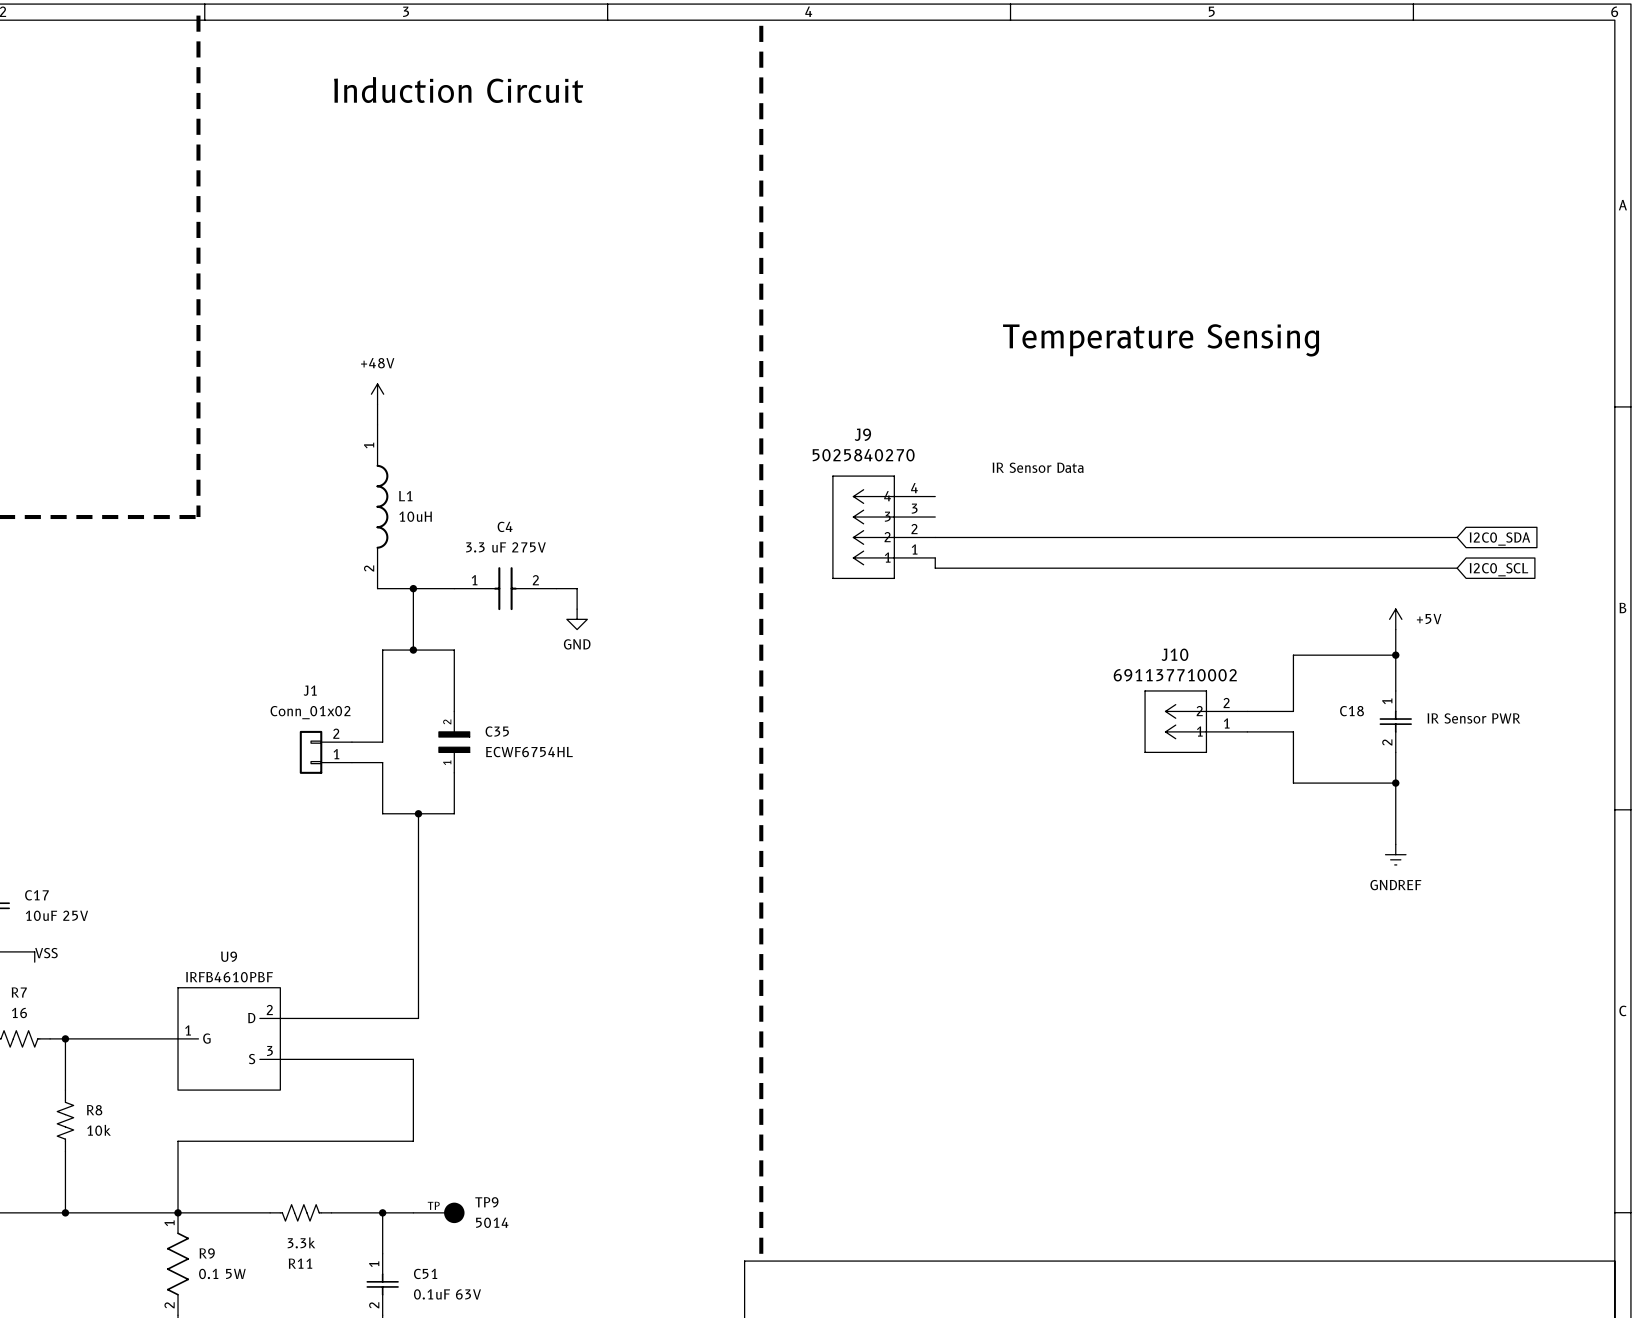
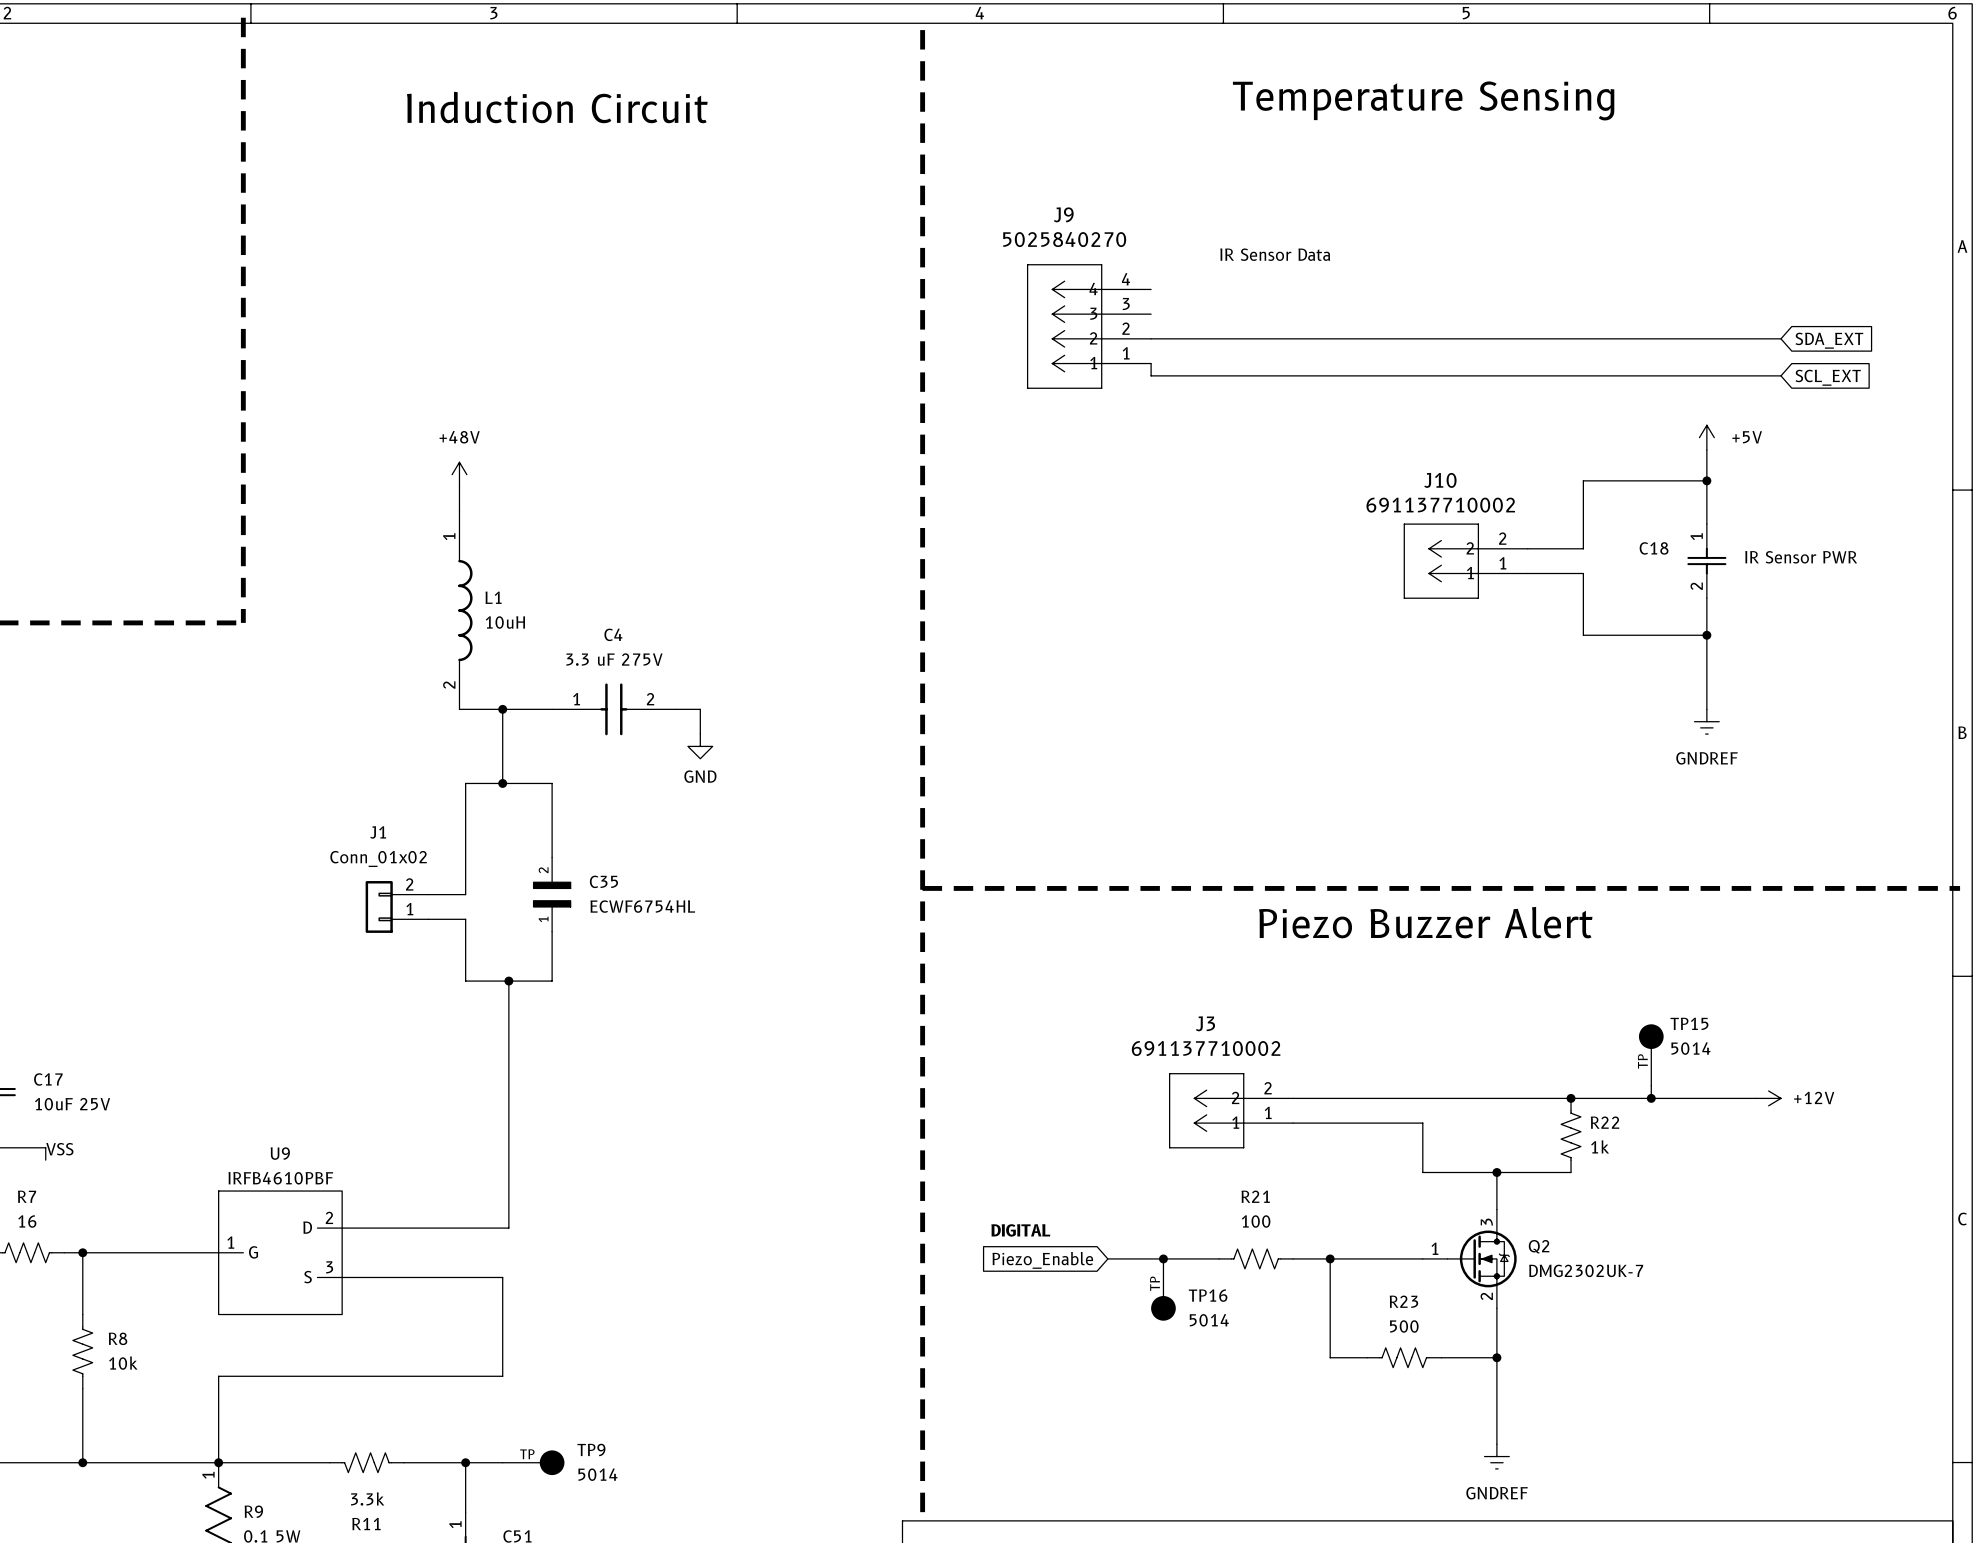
text: none -> Temperature Sensing (1423, 100)
text: none -> IR Sensor Data (1275, 254)
wire: none -> (1151, 338) (1780, 338)
global label: none -> SDA_EXT (1829, 340)
wire: none -> (1151, 363) (1151, 375) (1780, 375)
global label: none -> SCL_EXT (1828, 377)
text: Temperature Sensing (1161, 340) -> none
power symbol: none -> +5V (1706, 437)
wire: none -> (1706, 449) (1706, 524)
wire: none -> (1706, 480) (1583, 480) (1583, 548) (1527, 548)
junction: none -> (1706, 480)
text: none -> IR Sensor PWR (1801, 557)
text: IR Sensor Data (1038, 467) -> none
wire: none -> (1527, 573) (1583, 573) (1583, 635) (1706, 635)
wire: none -> (1706, 598) (1706, 709)
J9 position: (883, 527) -> (1089, 326)
junction: none -> (1706, 635)
wire: (935, 537) (1457, 537) -> none
global label: I2C0_SDA (1499, 539) -> none
wire: (935, 557) (935, 568) (1457, 568) -> none
global label: I2C0_SCL (1498, 569) -> none
power symbol: none -> GNDREF (1706, 721)
power symbol: +5V (1395, 619) -> none
wire: (1395, 629) (1395, 690) -> none
wire: (1395, 655) (1293, 655) (1293, 711) (1247, 711) -> none
junction: (1395, 655) -> none
text: IR Sensor PWR (1473, 718) -> none
J10 position: (1195, 721) -> (1465, 561)
C18 position: (1395, 721) -> (1706, 561)
wire: (1247, 731) (1293, 731) (1293, 783) (1395, 783) -> none
line: none -> (922, 888) (1960, 888)
wire: (1395, 752) (1395, 844) -> none
text: none -> Piezo Buzzer Alert (1425, 922)
junction: (1395, 783) -> none
power symbol: GNDREF (1395, 854) -> none
TP15: none -> 5014 (1651, 1055)
wire: none -> (1651, 1086) (1651, 1098)
wire: none -> (1293, 1098) (1756, 1098)
junction: none -> (1571, 1098)
junction: none -> (1651, 1098)
power symbol: none -> +12V (1768, 1098)
J3: none -> 691137710002 (1231, 1110)
wire: none -> (1293, 1123) (1422, 1123) (1422, 1172) (1571, 1172)
R22: none -> 1k (1571, 1135)
wire: none -> (1496, 1172) (1496, 1209)
junction: none -> (1496, 1172)
text: none -> DIGITAL (1020, 1230)
wire: none -> (1107, 1258) (1219, 1258)
junction: none -> (1163, 1258)
R21: none -> 100 (1256, 1258)
wire: none -> (1293, 1258) (1422, 1258)
wire: none -> (1330, 1258) (1330, 1357) (1367, 1357)
junction: none -> (1330, 1258)
Q2: none -> DMG2302UK-7 (1469, 1258)
global label: none -> Piezo_Enable (1042, 1260)
TP16: none -> 5014 (1163, 1289)
wire: none -> (1496, 1308) (1496, 1444)
R23: none -> 500 (1404, 1357)
wire: none -> (1441, 1357) (1496, 1357)
junction: none -> (1496, 1357)
power symbol: none -> GNDREF (1496, 1456)

